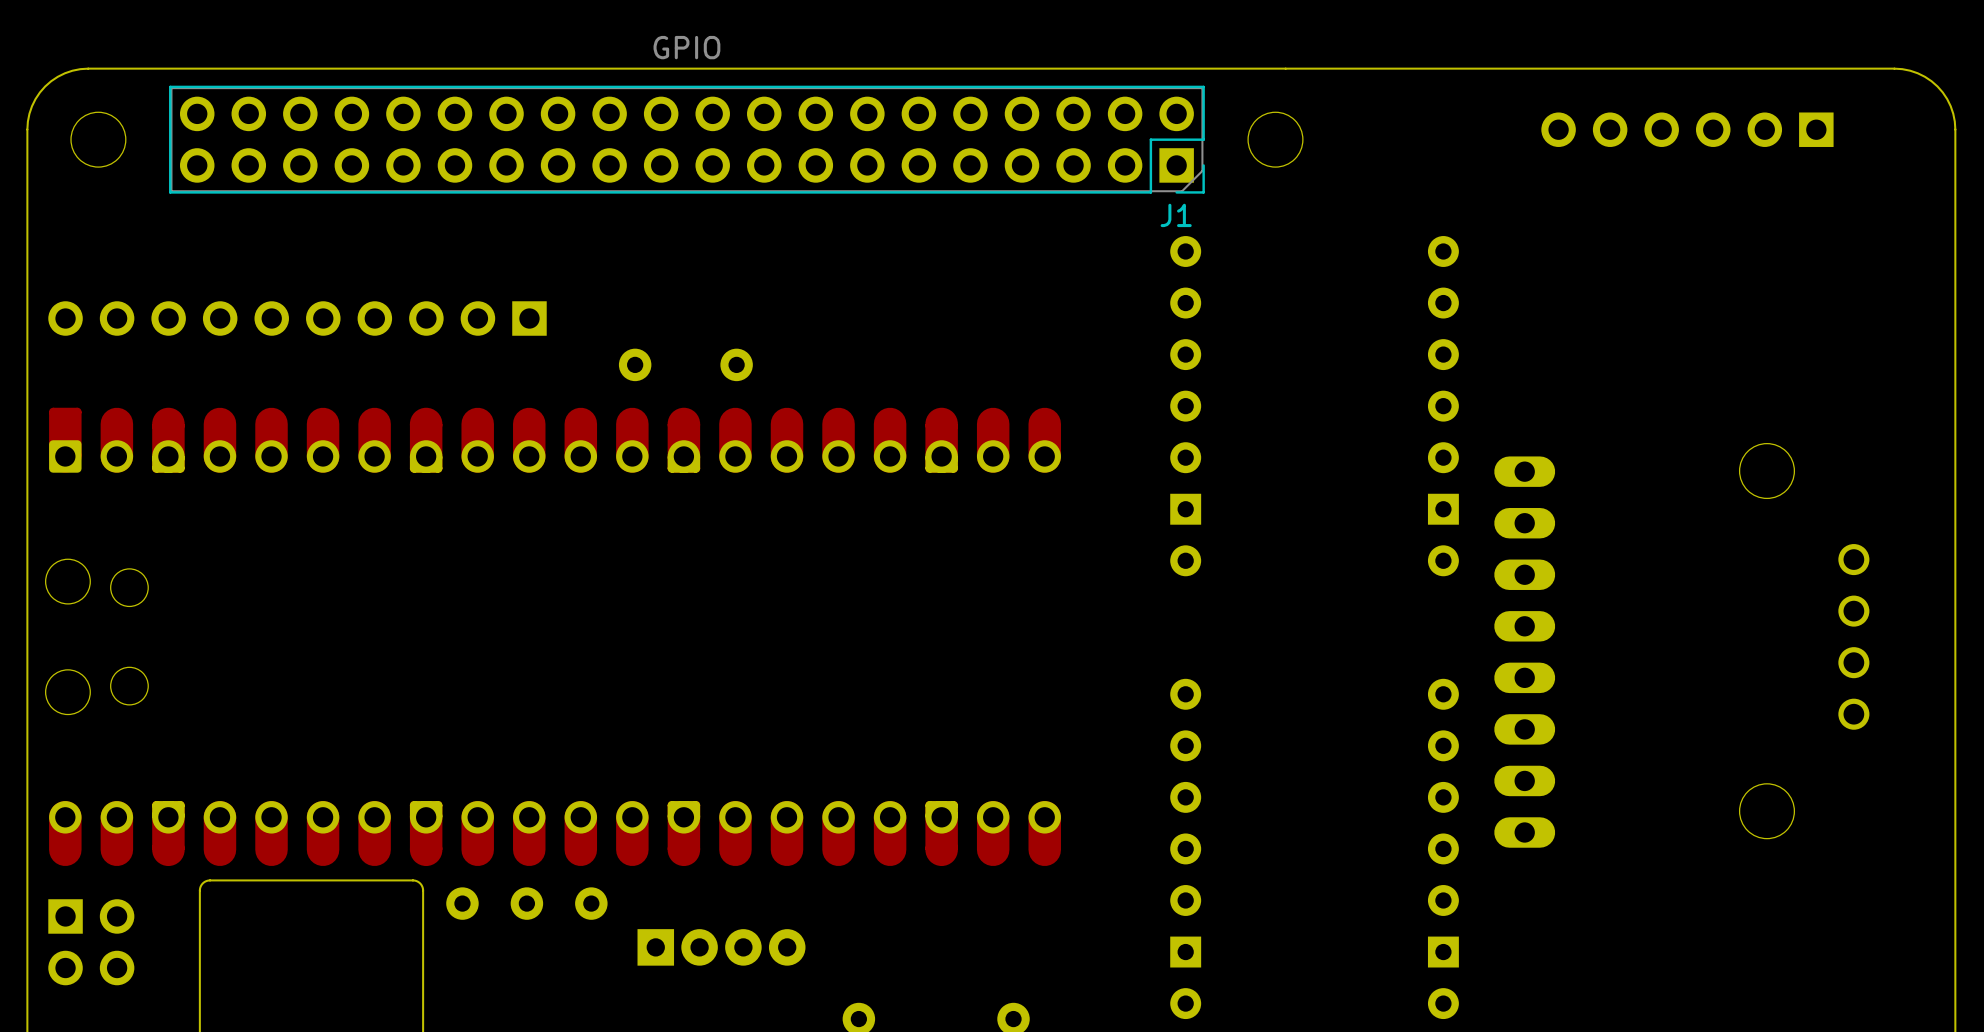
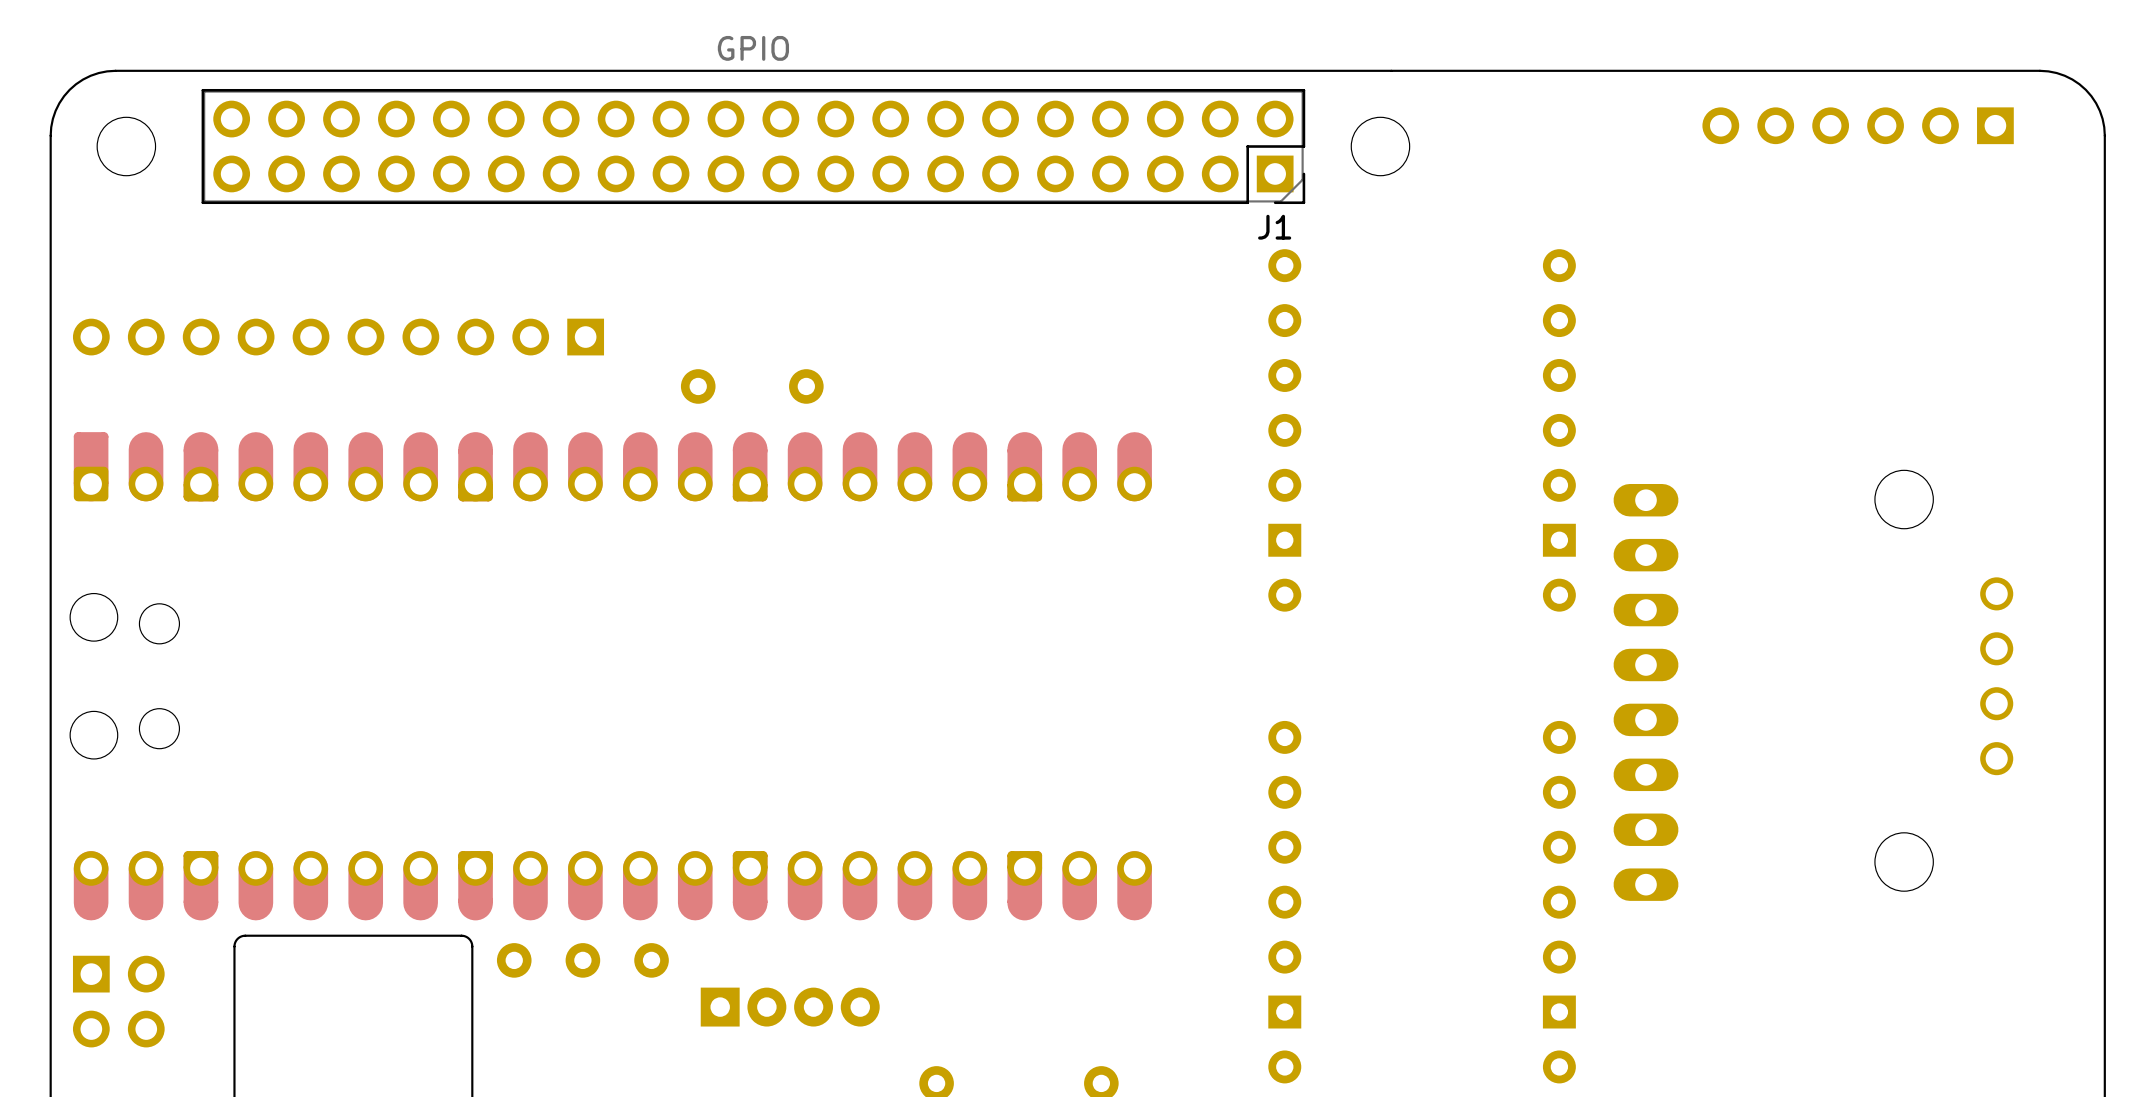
part position: (1687, 129) -> (1858, 125)

